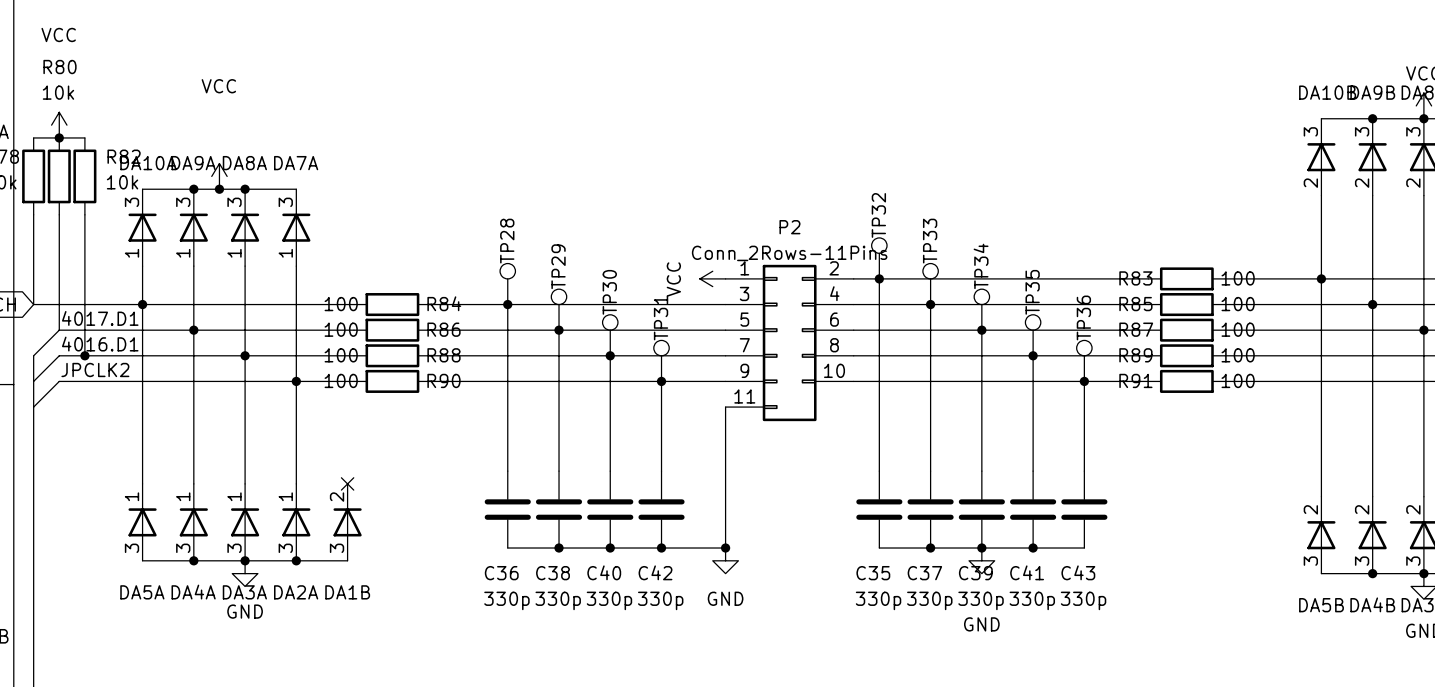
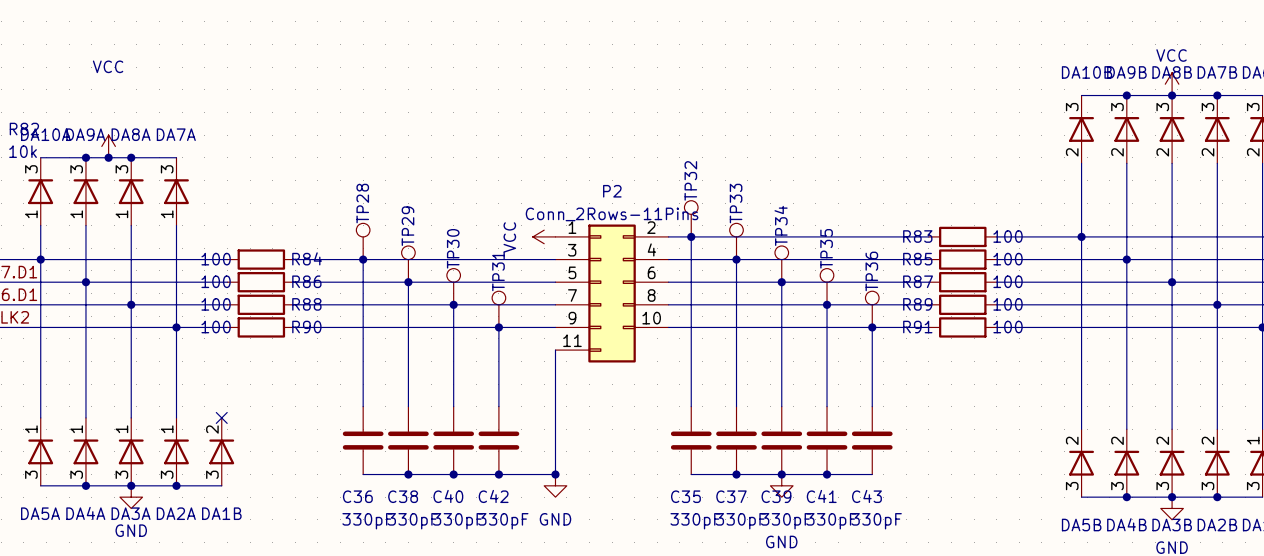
C36 value: 330p (506, 600) -> 330pF (367, 521)
C38 value: 330p (558, 600) -> 330pF (412, 521)
C40 value: 330p (609, 600) -> 330pF (458, 521)
C42 value: 330p (660, 600) -> 330pF (503, 521)
C35 value: 330p (878, 600) -> 330pF (695, 521)
C37 value: 330p (929, 600) -> 330pF (740, 521)
C39 value: 330p (981, 600) -> 330pF (786, 521)
C41 value: 330p (1032, 600) -> 330pF (831, 521)
C43 value: 330p (1083, 600) -> 330pF (876, 521)

